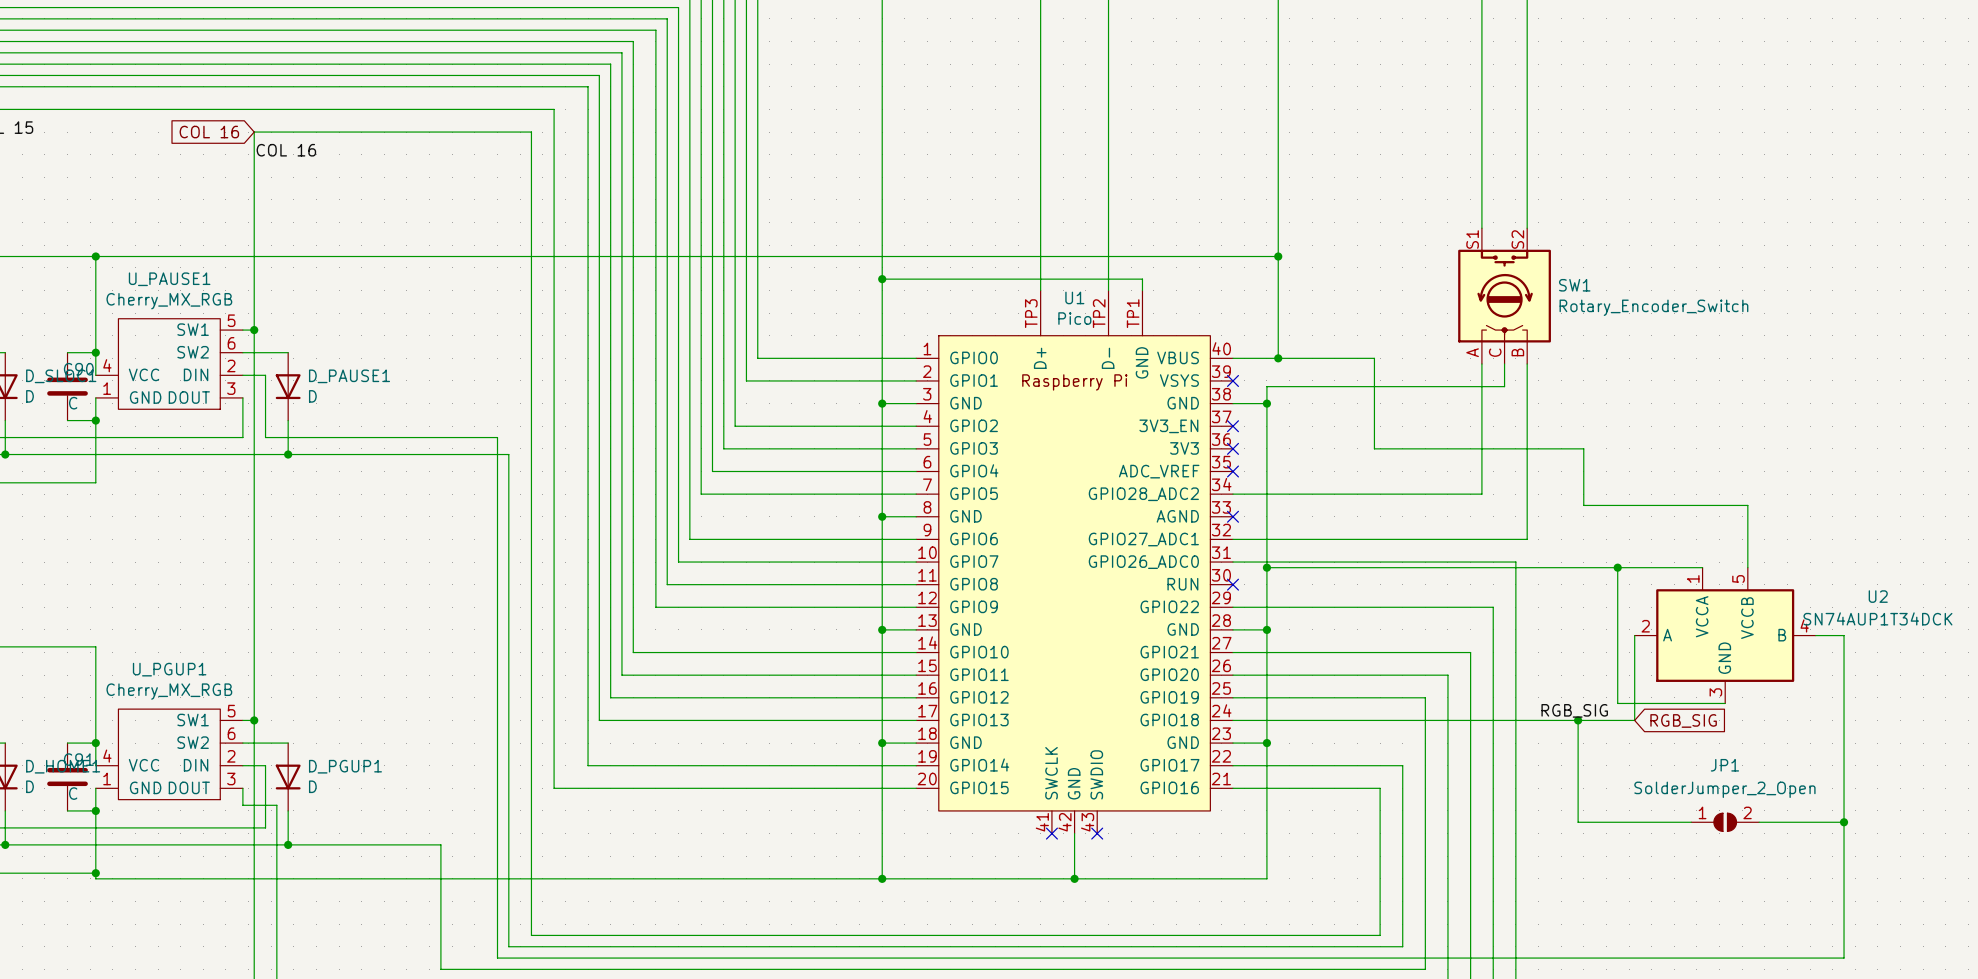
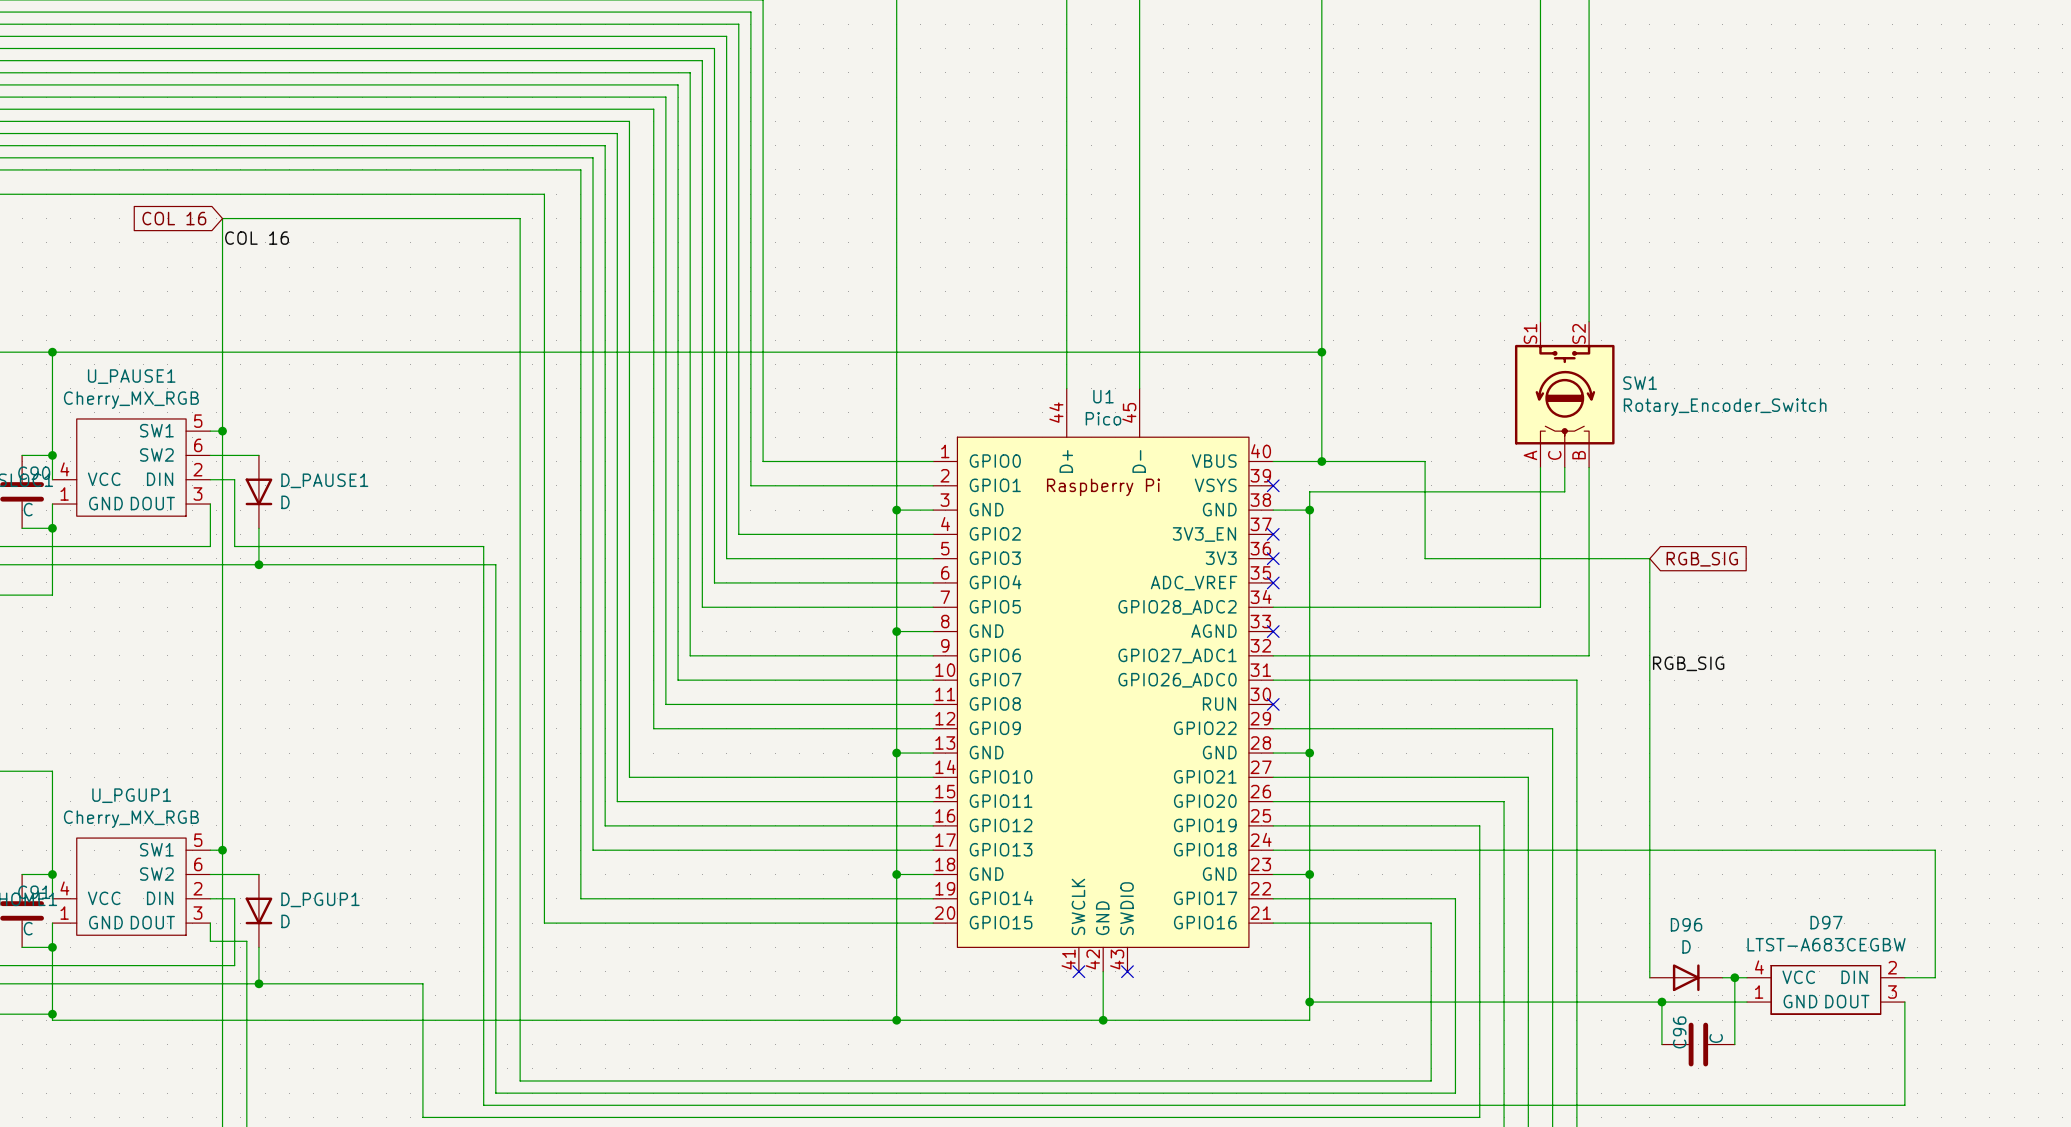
wire: (882, 279) (1142, 279) (1142, 290) -> none
junction: (882, 279) -> none
U1 symbol: [916, 290, 1233, 834] -> [933, 388, 1274, 972]
global label: none -> RGB_SIG (1702, 559)
wire: (1583, 505) (1747, 505) (1747, 567) -> (1649, 619) (1649, 977)
wire: (1266, 567) (1702, 567) -> none
junction: (1266, 567) -> none
wire: (1617, 567) (1617, 703) (1725, 703) -> none
junction: (1617, 567) -> none
wire: (1634, 635) (1634, 720) -> (1904, 977) (1935, 977) (1935, 850) (1704, 850)
U2: SN74AUP1T34DCK (1725, 635) -> none
wire: (1815, 635) (1844, 635) (1844, 958) (1821, 958) -> (1904, 1002) (1904, 1105)
label position: RGB_SIG (1574, 710) -> RGB_SIG (1688, 663)
wire: (1578, 720) (1578, 822) (1691, 822) -> none
junction: (1578, 720) -> none
global label: RGB_SIG (1683, 720) -> none
JP1: SolderJumper_2_Open (1725, 822) -> none
wire: (1759, 822) (1844, 822) -> none
junction: (1844, 822) -> none
D96: none -> D (1686, 977)
wire: none -> (1722, 977) (1746, 977)
wire: none -> (1734, 977) (1734, 1044)
junction: none -> (1734, 977)
D97: none -> LTST-A683CEGBW (1825, 989)
wire: none -> (1309, 1002) (1746, 1002)
junction: none -> (1309, 1002)
wire: none -> (1661, 1002) (1661, 1044)
junction: none -> (1661, 1002)
C96: none -> C (1698, 1044)

